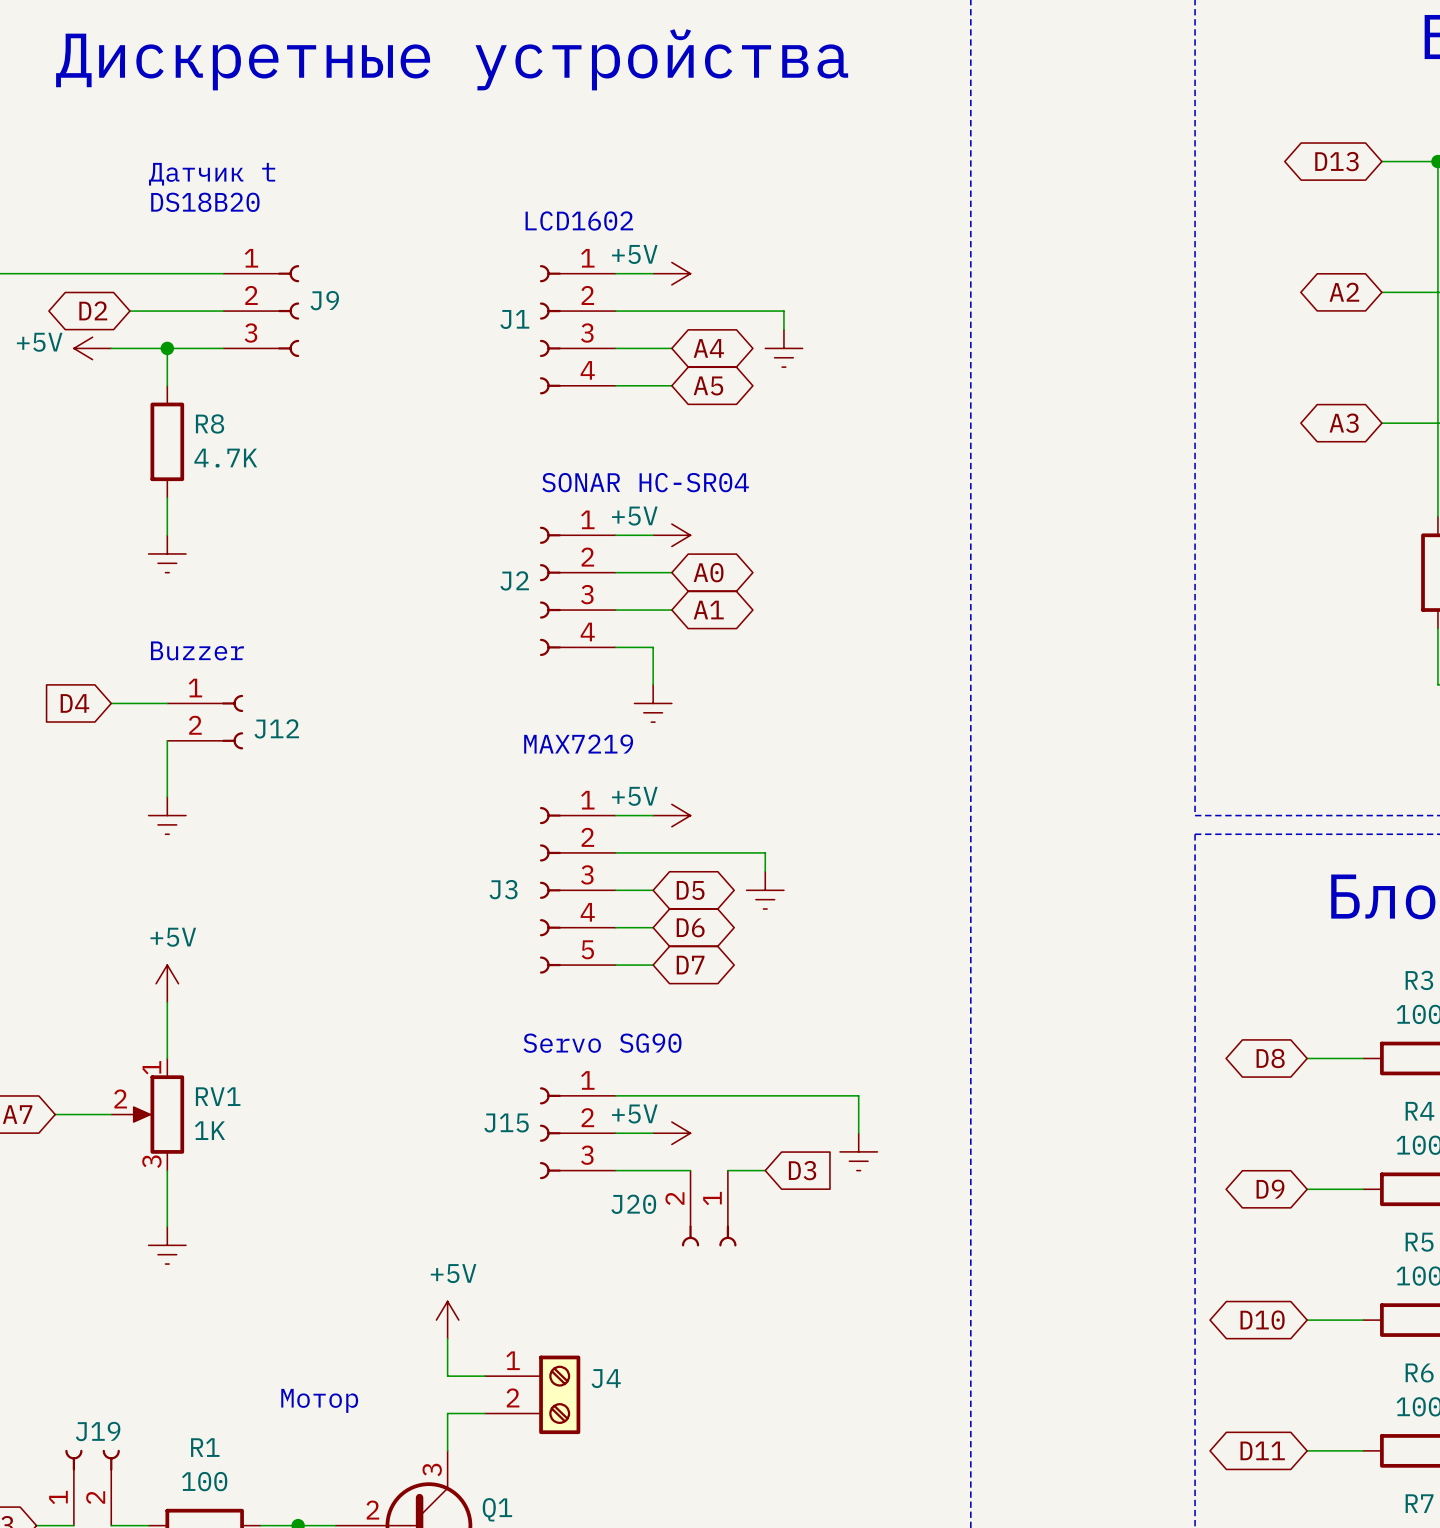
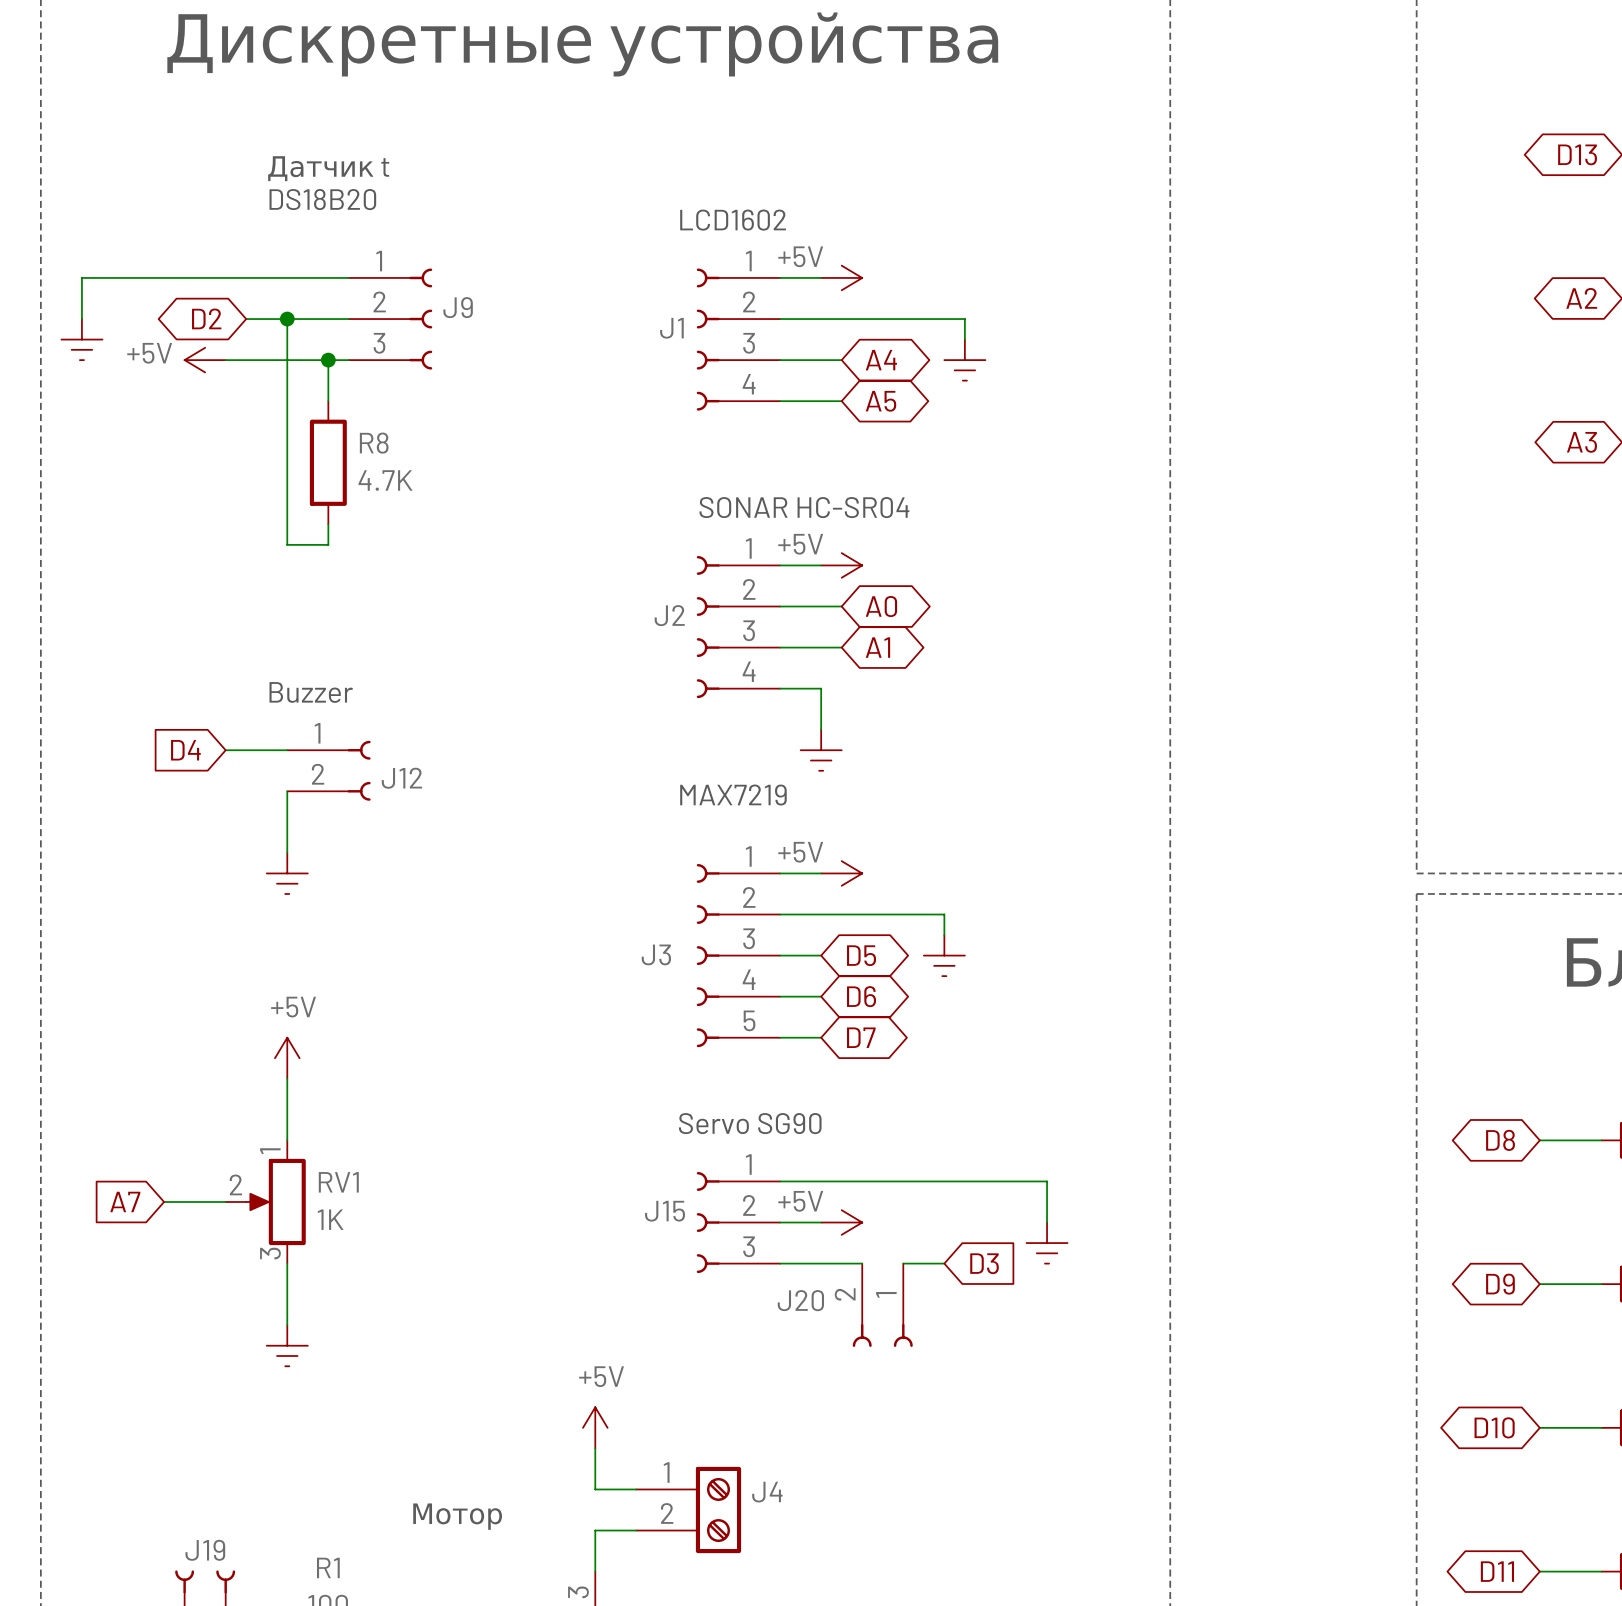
wire: none -> (287, 319) (287, 360)
junction: none -> (287, 319)
junction: (167, 348) -> none
wire: none -> (328, 360) (328, 401)
junction: none -> (328, 360)
wire: none -> (287, 401) (287, 524)
R8 position: (167, 441) -> (328, 462)
wire: (167, 516) (167, 535) -> (287, 544) (328, 544) (328, 524)
power symbol: (167, 553) -> none

